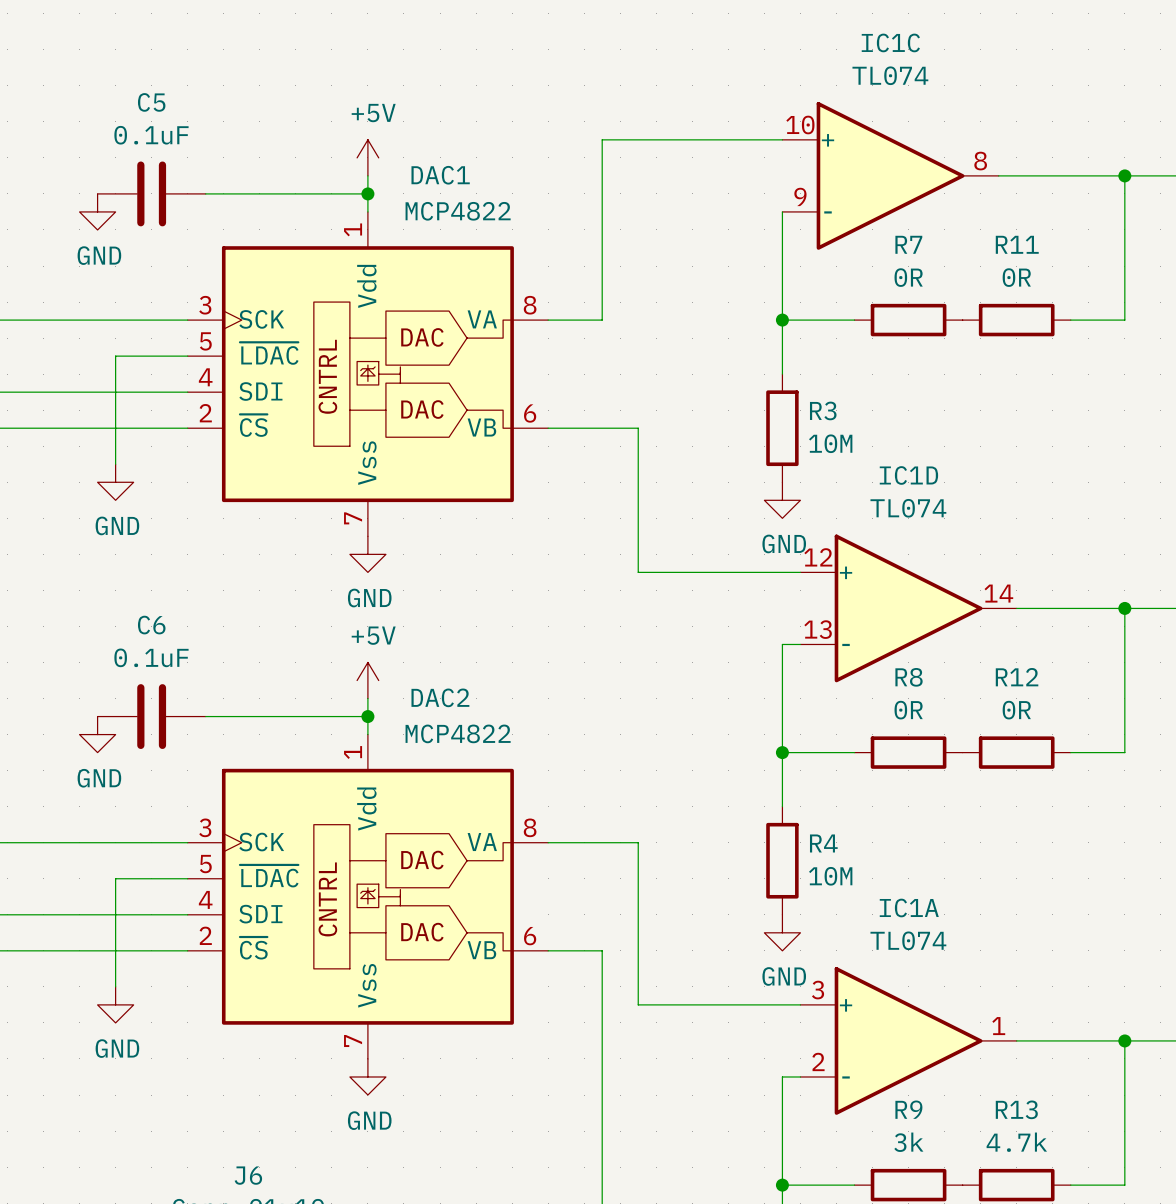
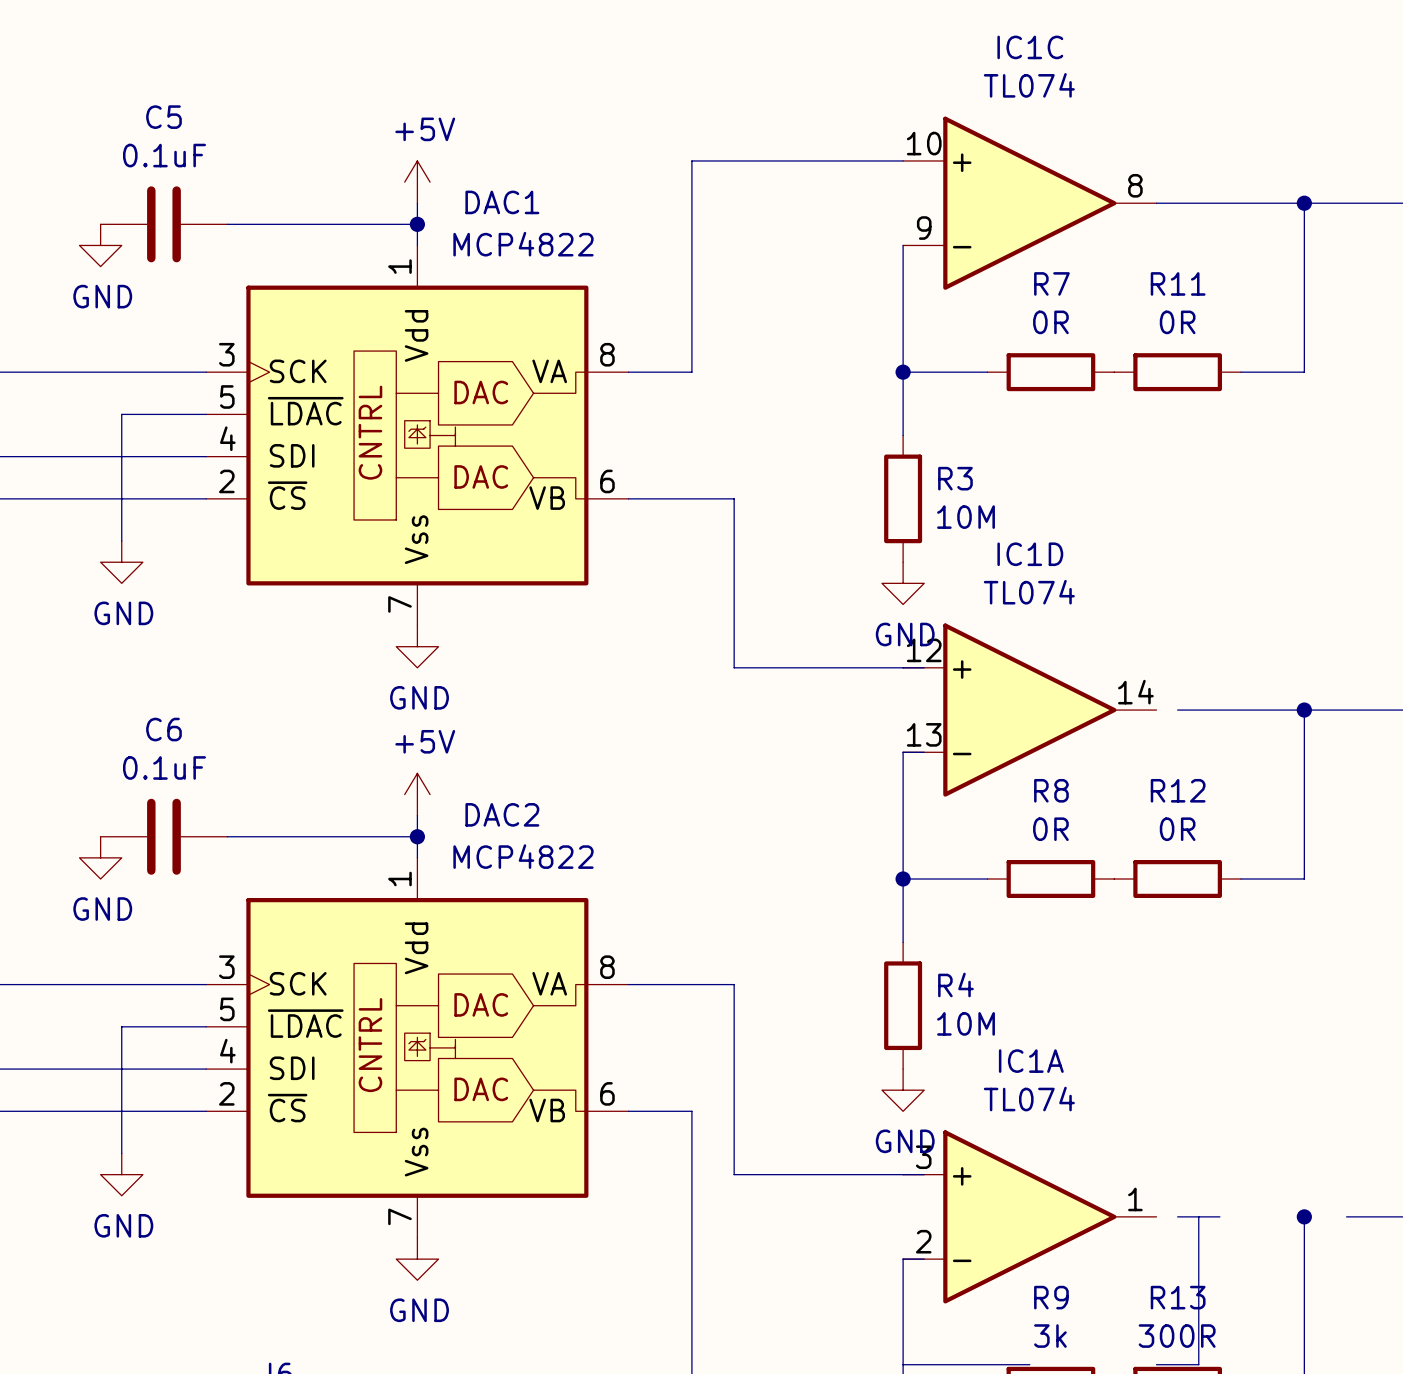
IC1D position: (908, 608) -> (1029, 710)
IC1A position: (908, 1040) -> (1029, 1216)
wire: none -> (1198, 1216) (1198, 1364) (1156, 1364)
wire: (1052, 1040) (1160, 1040) -> (903, 1364) (1029, 1364)
R13 value: 4.7k (1016, 1142) -> 300R (1177, 1336)

